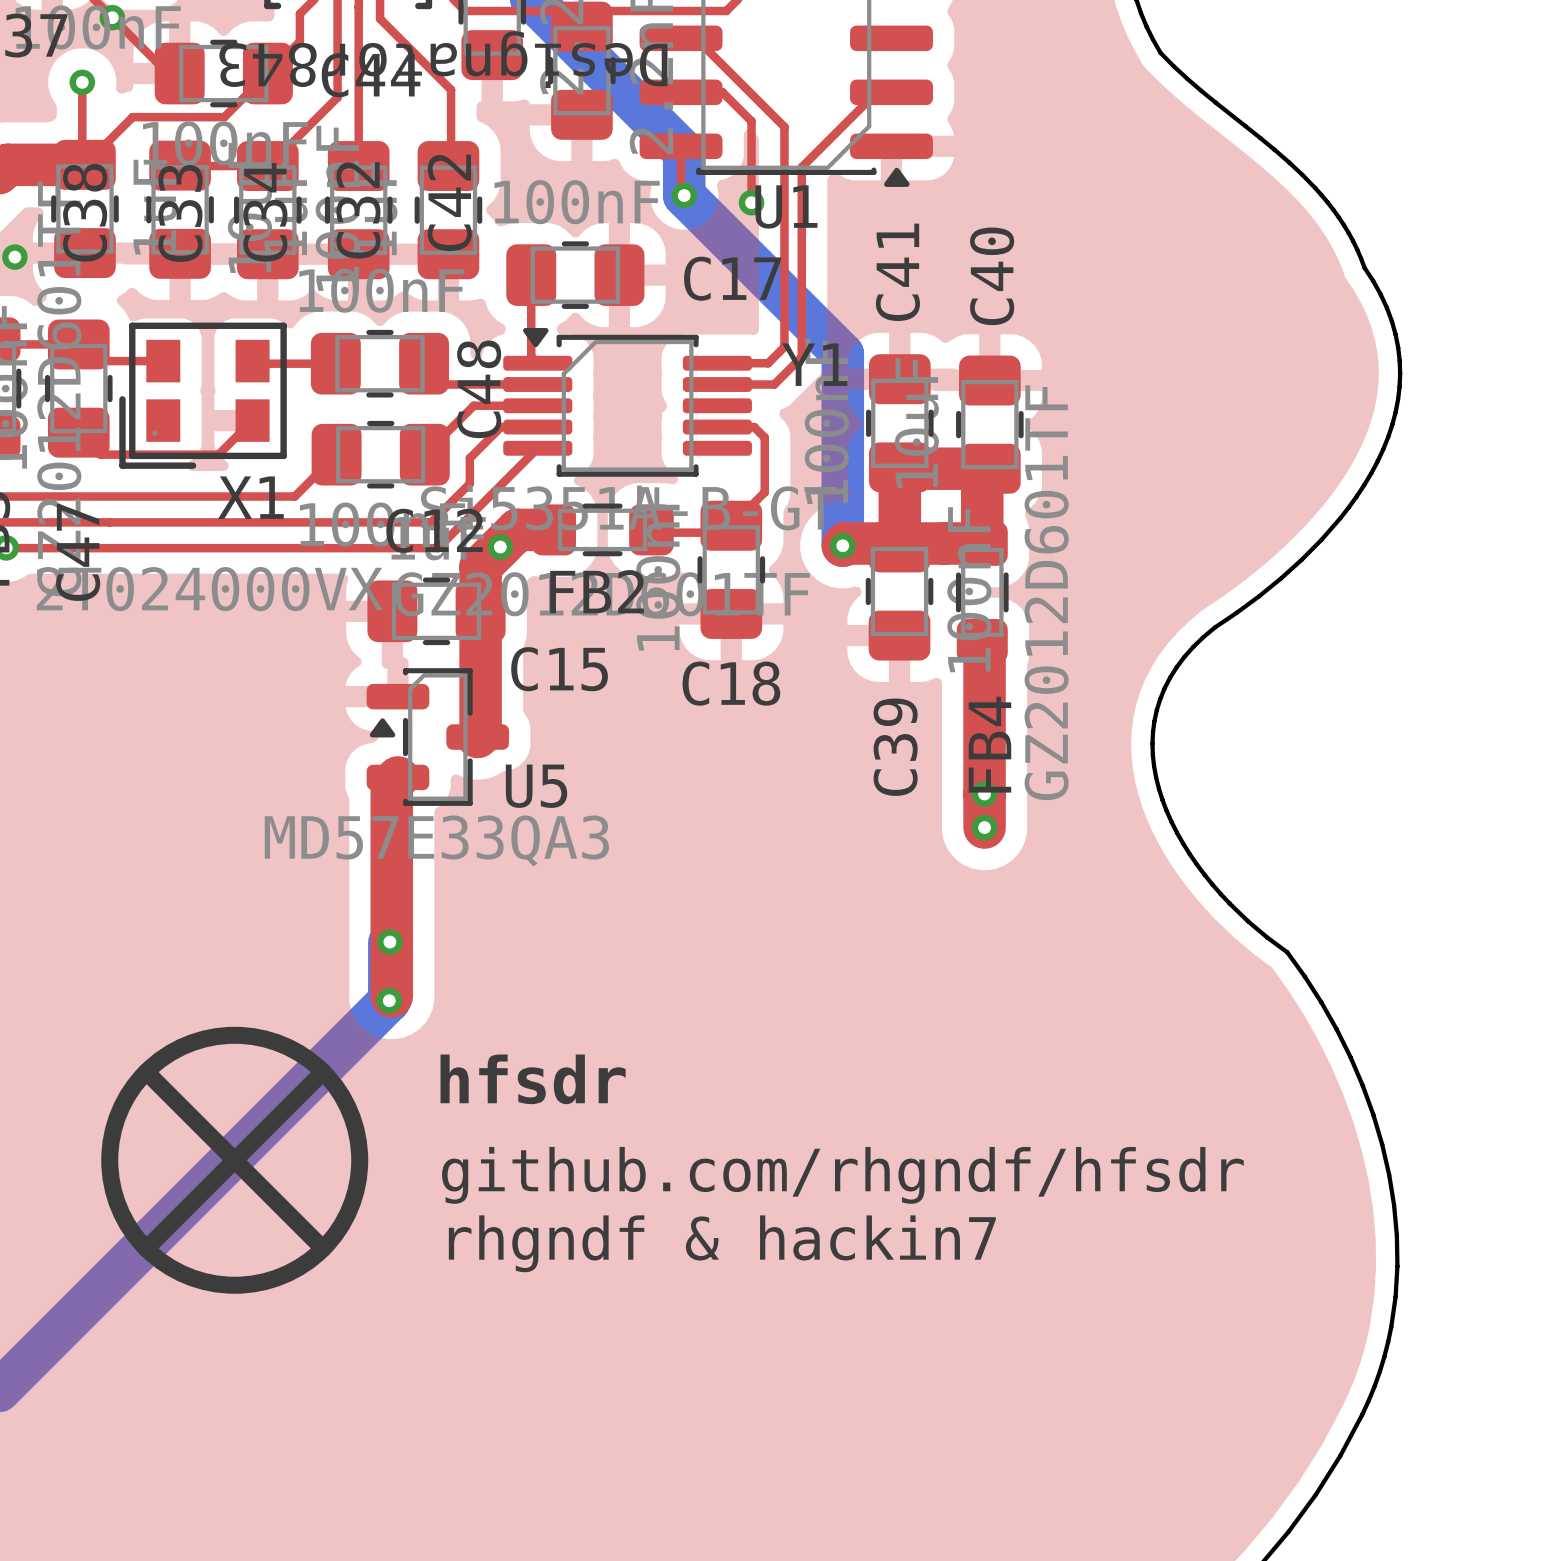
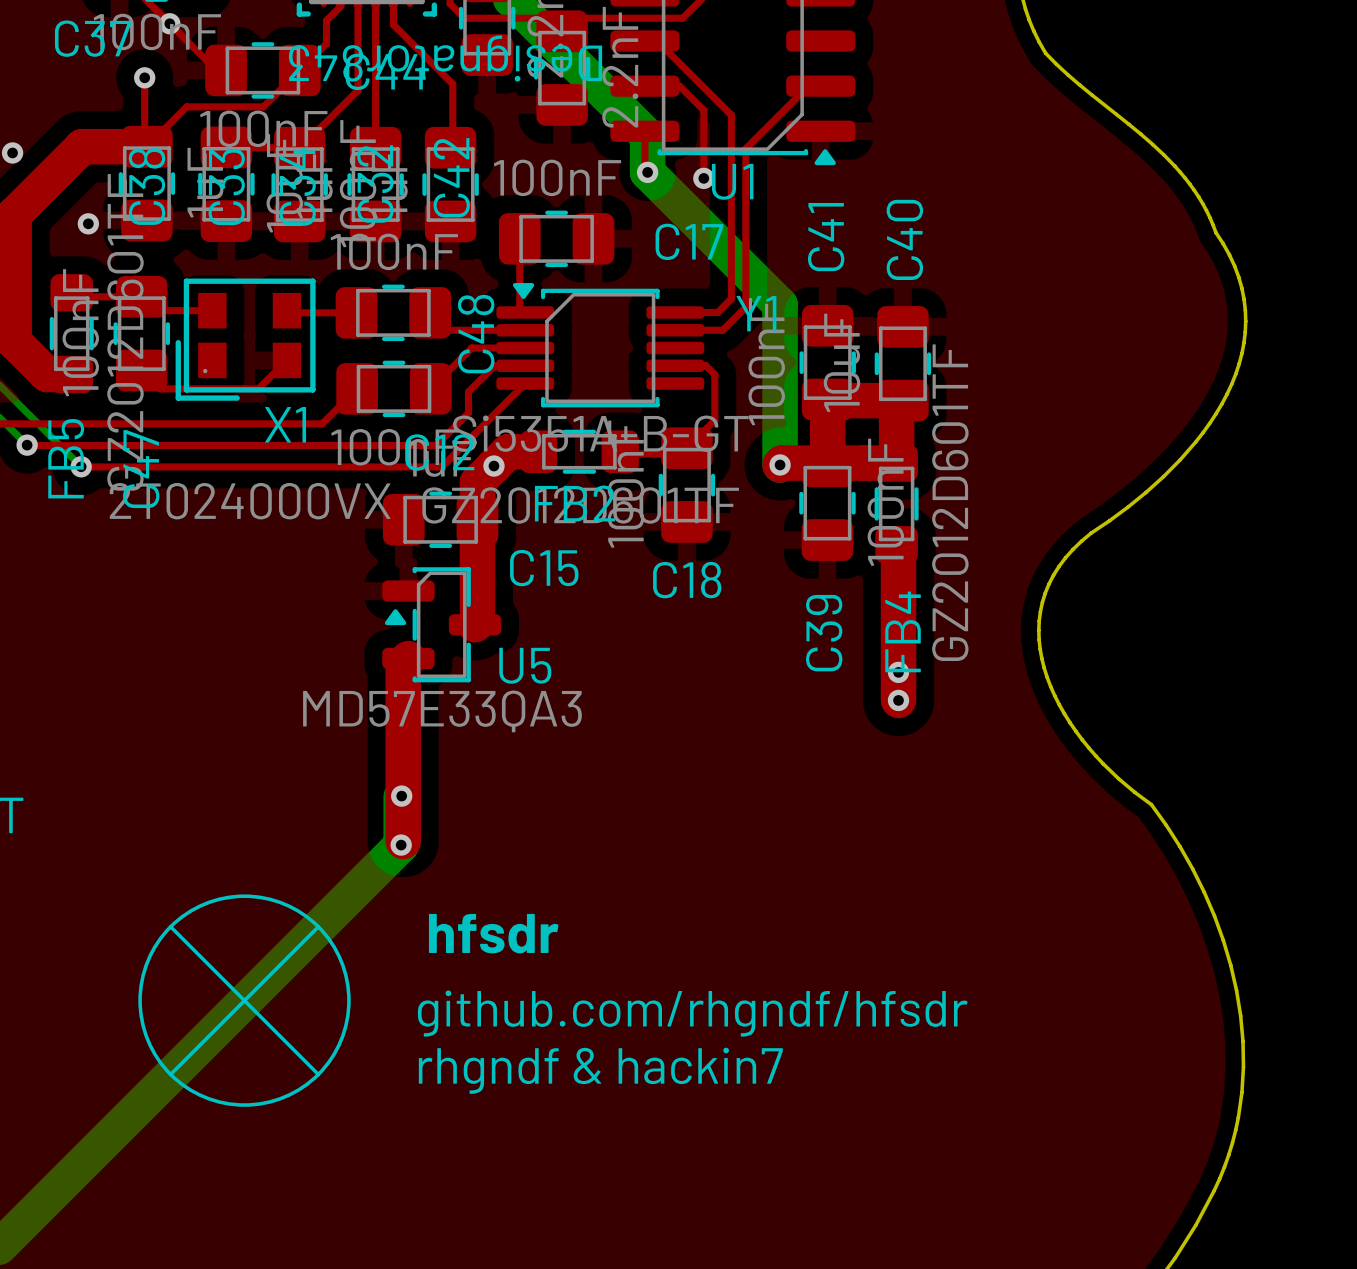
drawing shape: [101, 1026, 369, 1294] -> [138, 894, 351, 1107]
line: (146, 1071) (323, 1248) -> (170, 926) (318, 1074)
line: (323, 1071) (146, 1248) -> (318, 926) (170, 1074)
text position: hfsdr (533, 1079) -> hfsdr (493, 933)
text position: github.com/rhgndf/hfsdr (842, 1175) -> github.com/rhgndf/hfsdr (692, 1013)
text position: rhgndf & hackin7 (722, 1243) -> rhgndf & hackin7 (600, 1070)

